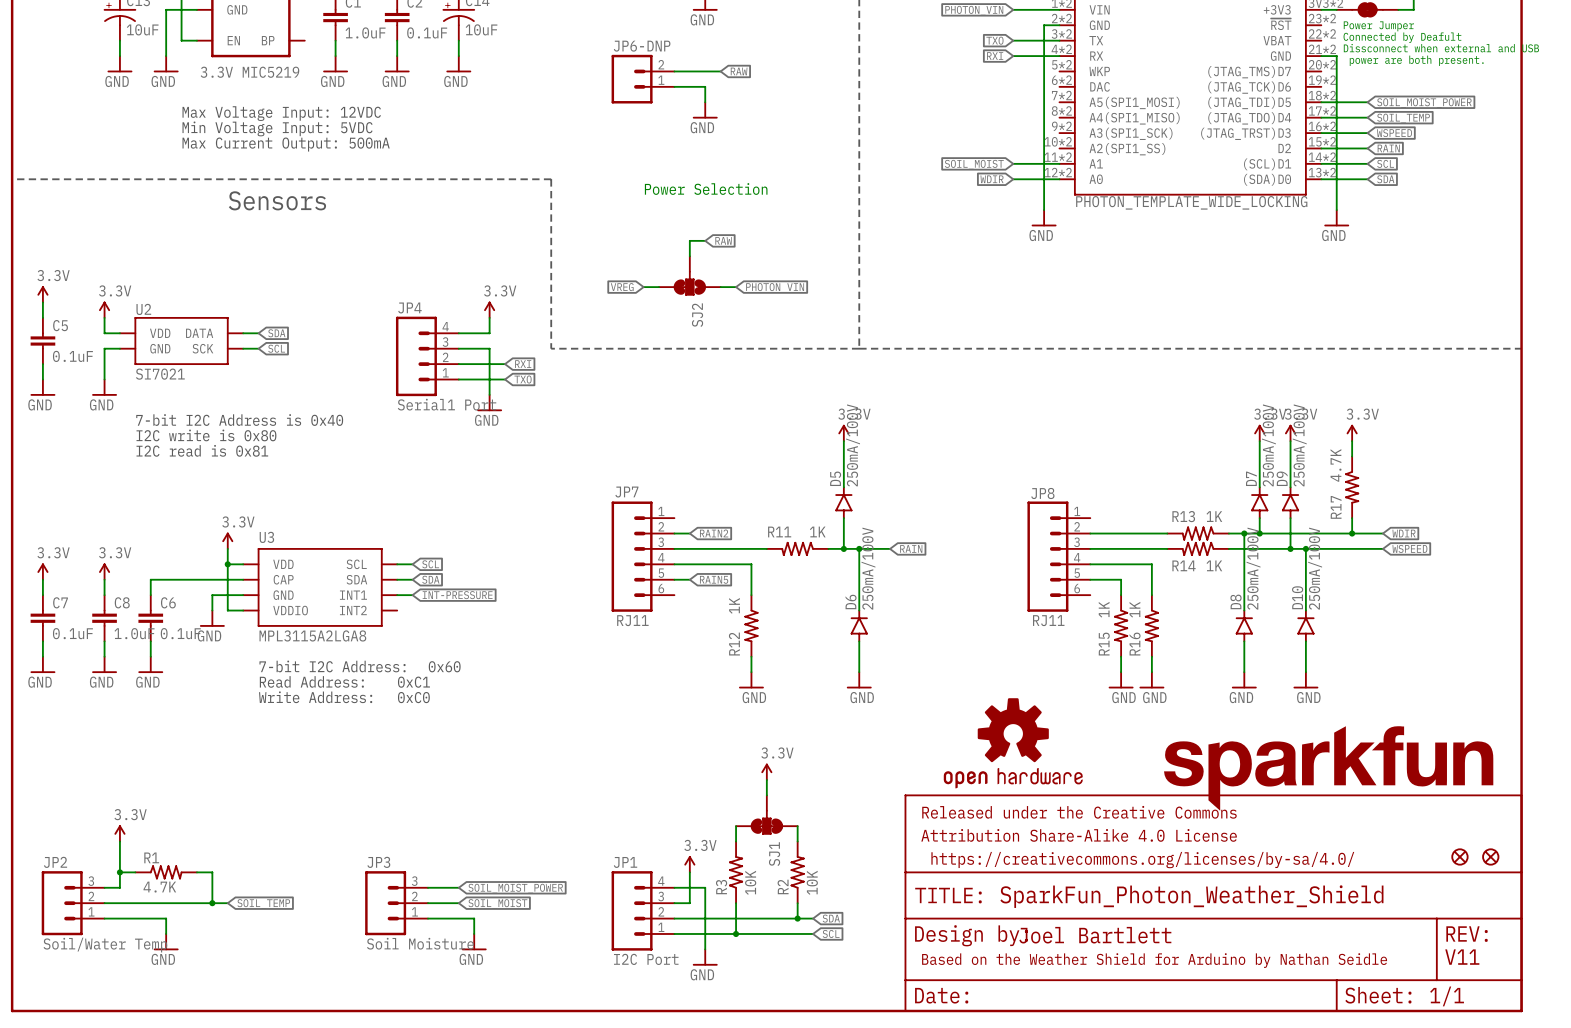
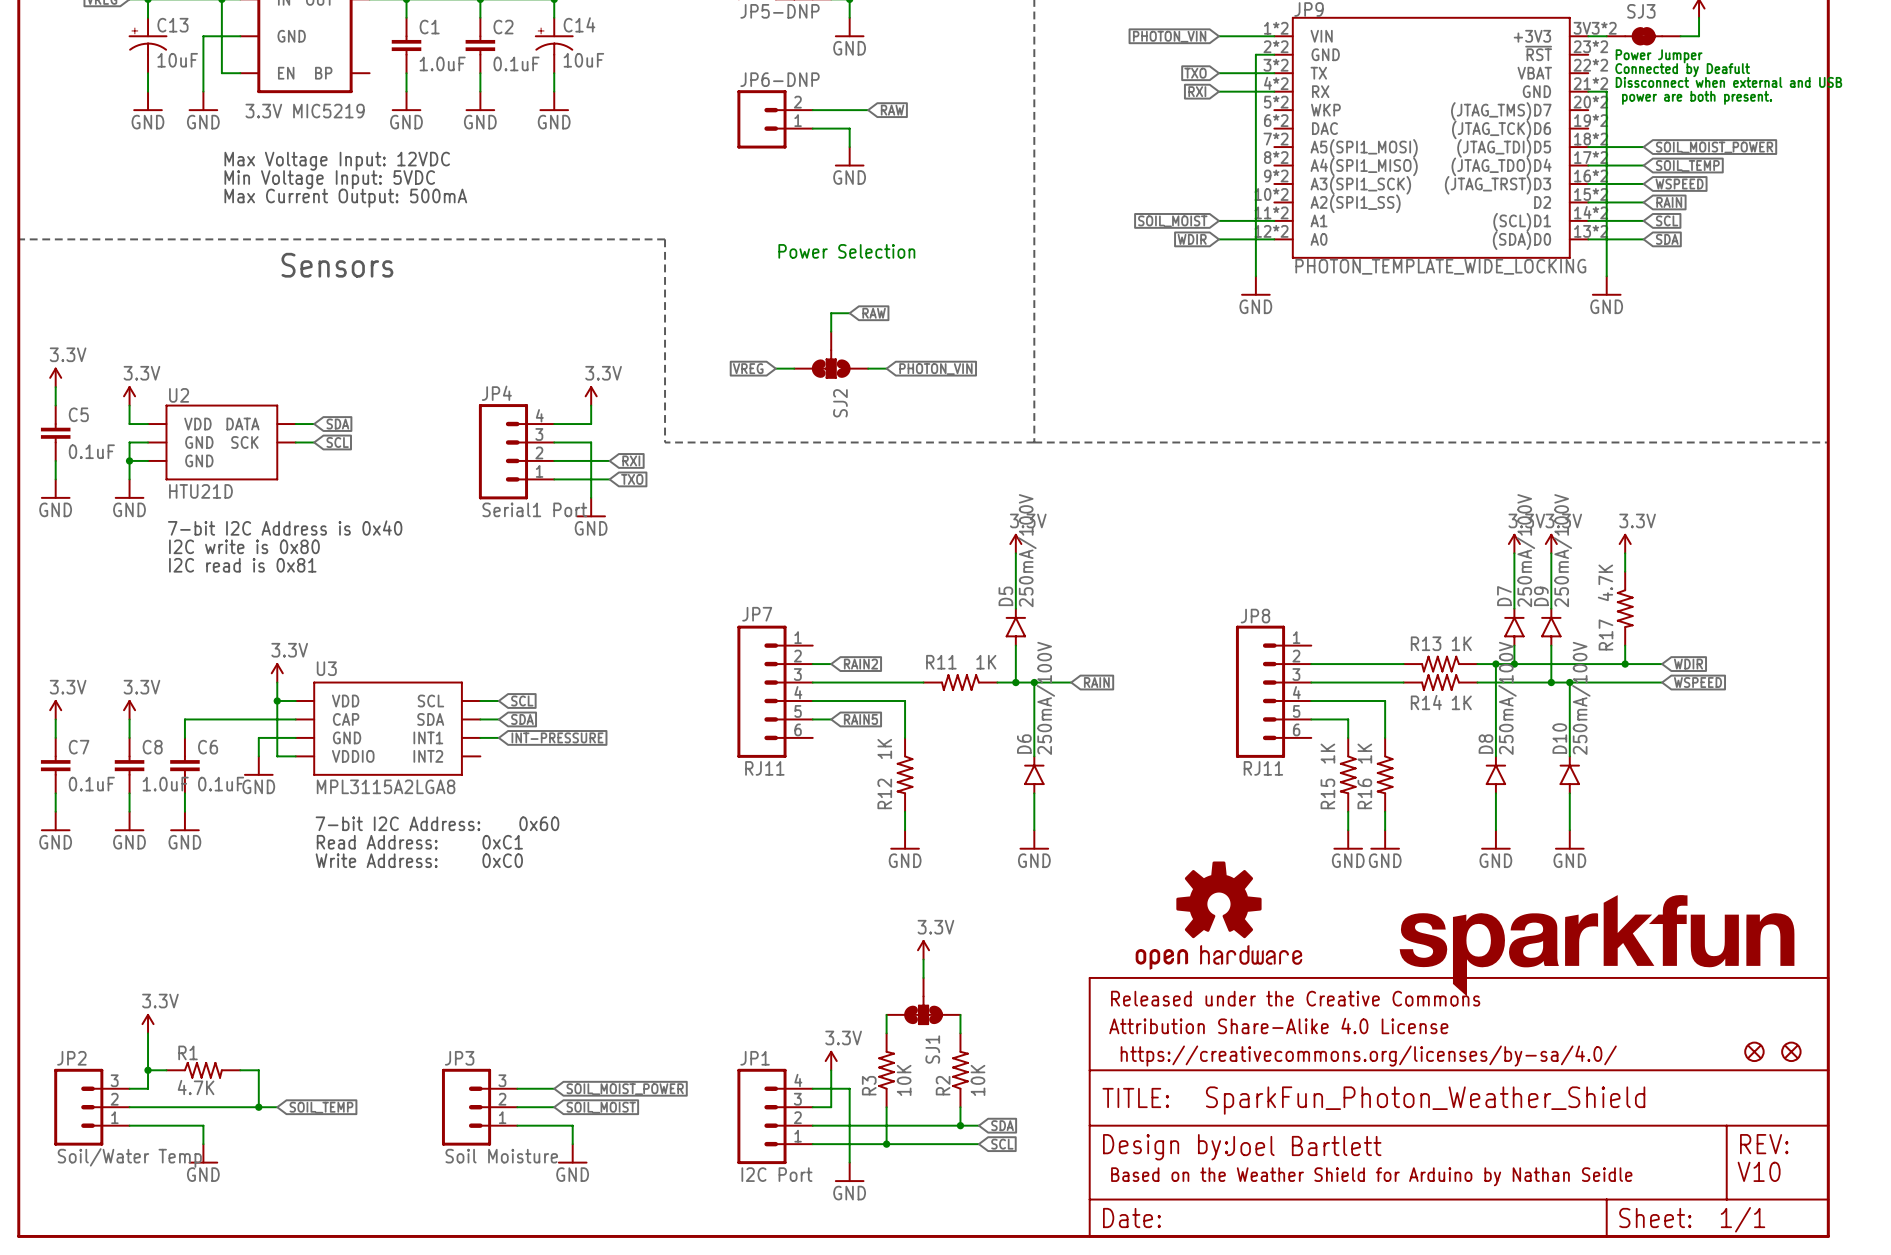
U2 symbol: [119, 317, 244, 365] -> [148, 404, 296, 481]
wire: none -> (129, 460) (148, 460)
junction: none -> (129, 460)
U2 value: SI7021 (160, 374) -> HTU21D (200, 491)
text: V11 (1462, 957) -> V10 (1759, 1171)

